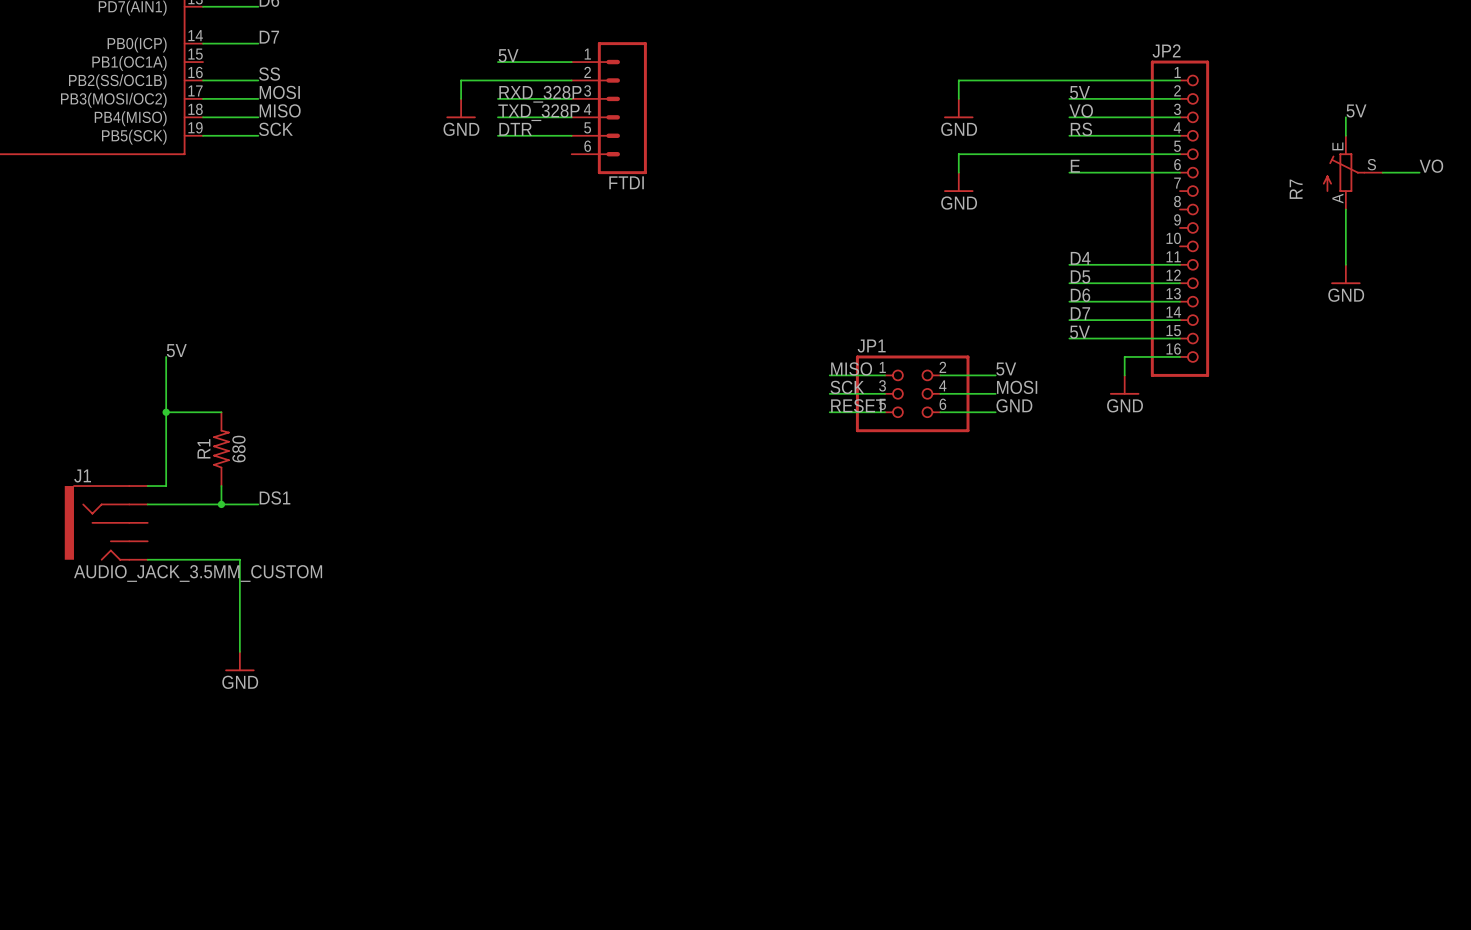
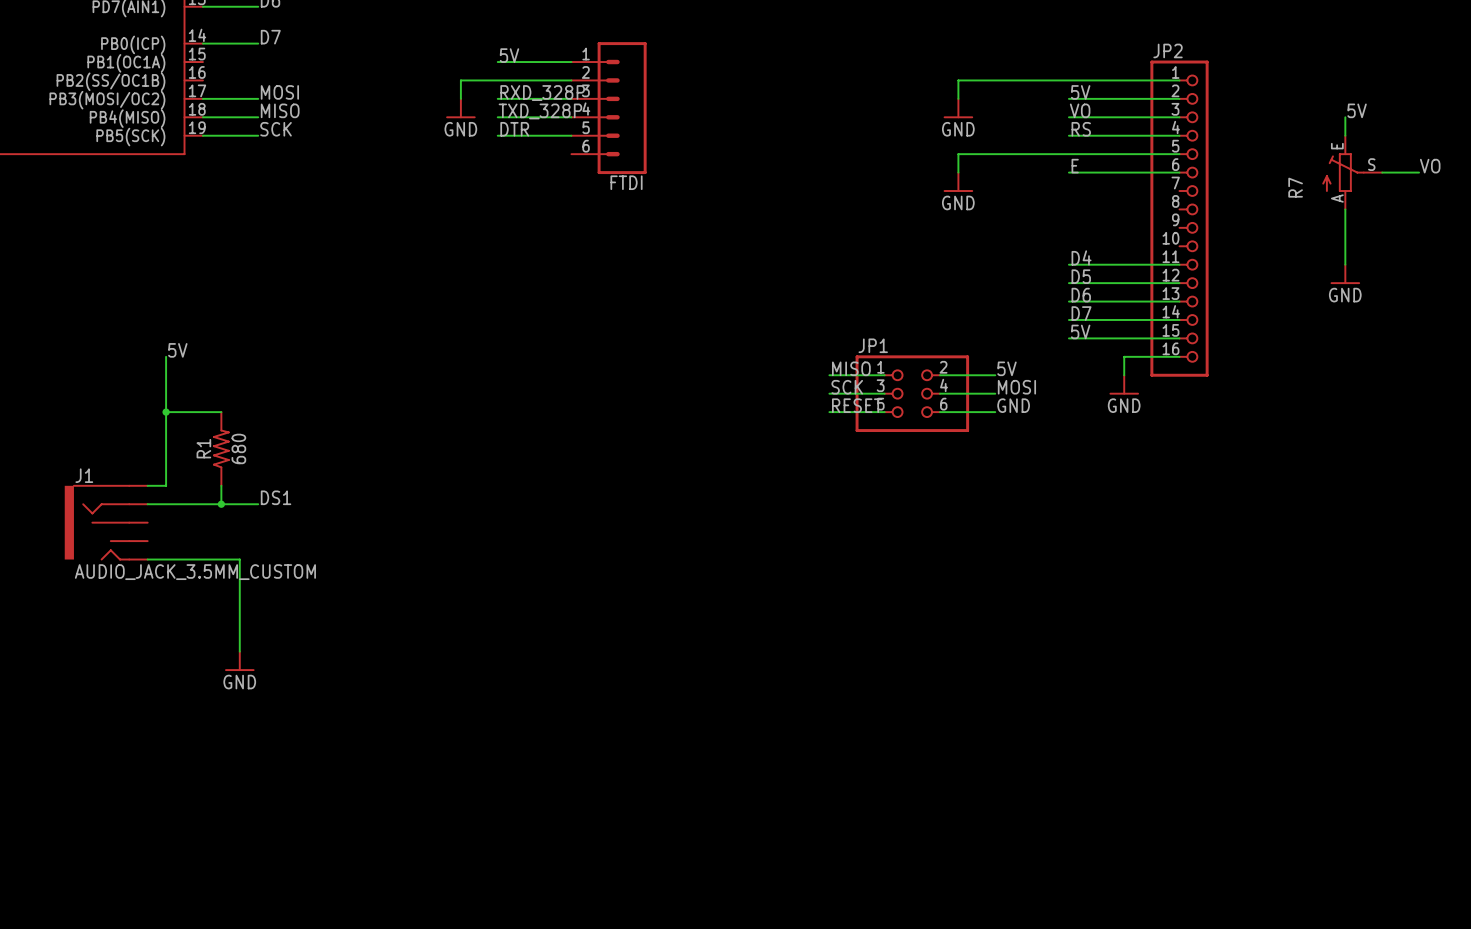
label: SS (269, 74) -> none
wire: (203, 80) (258, 80) -> none

